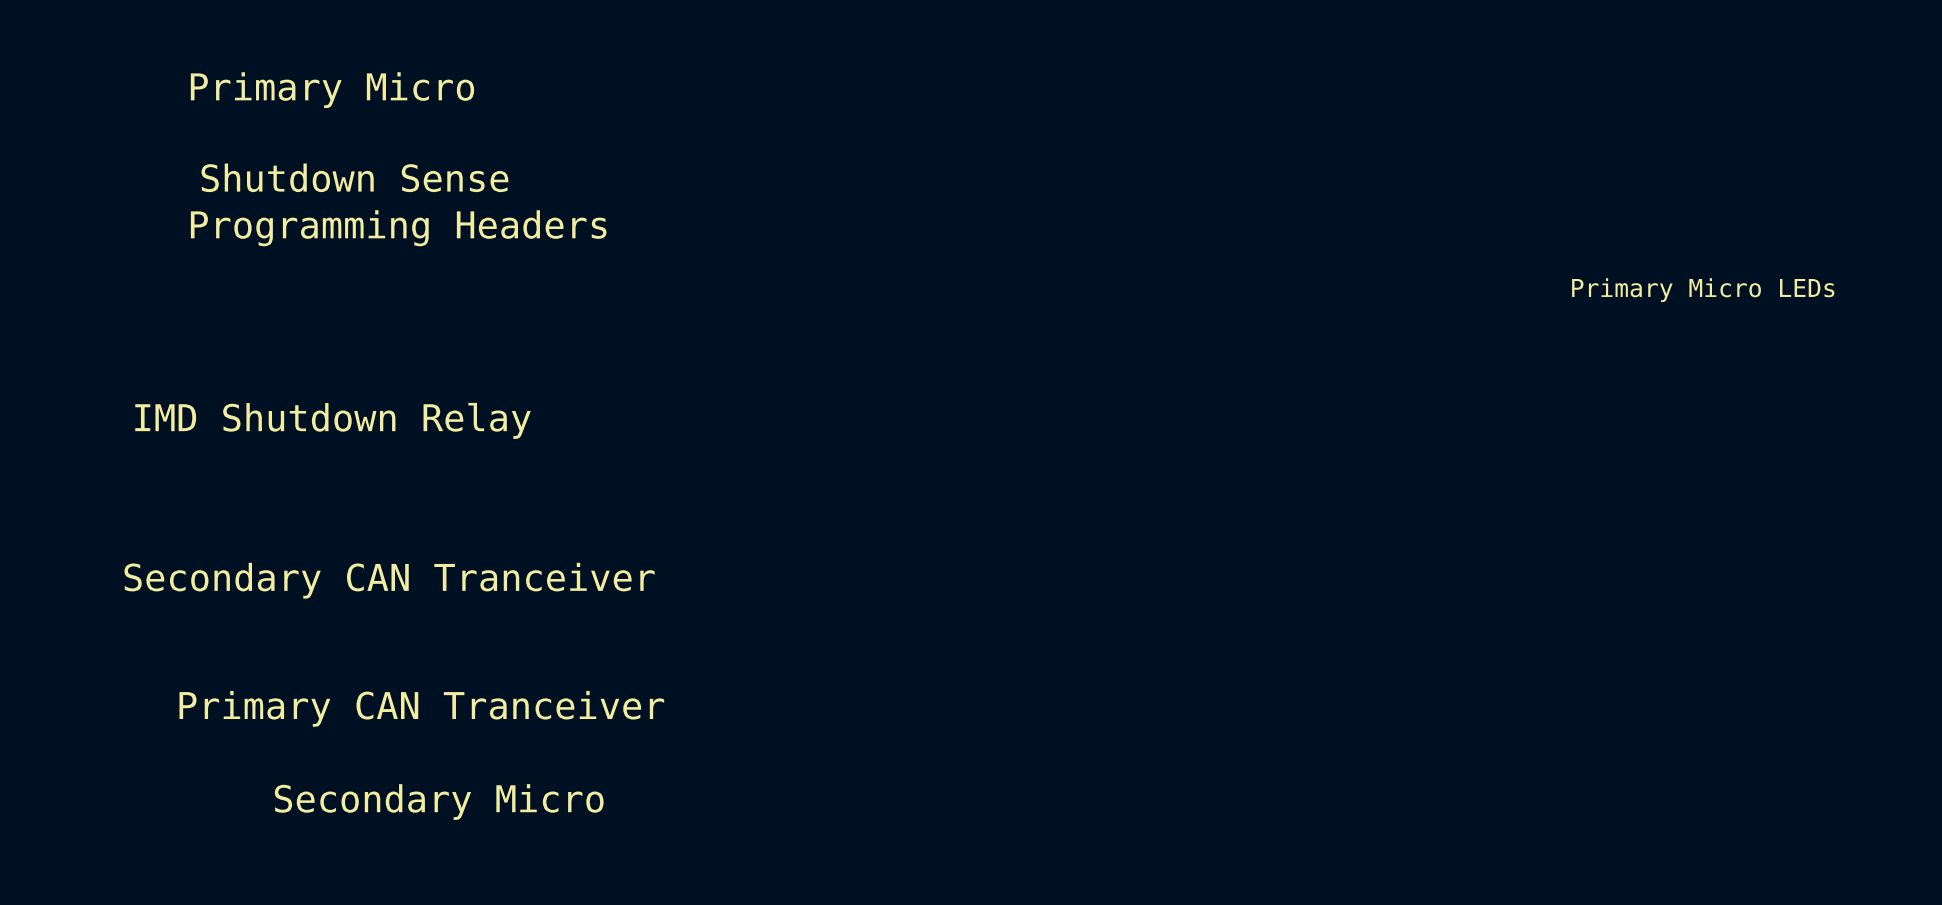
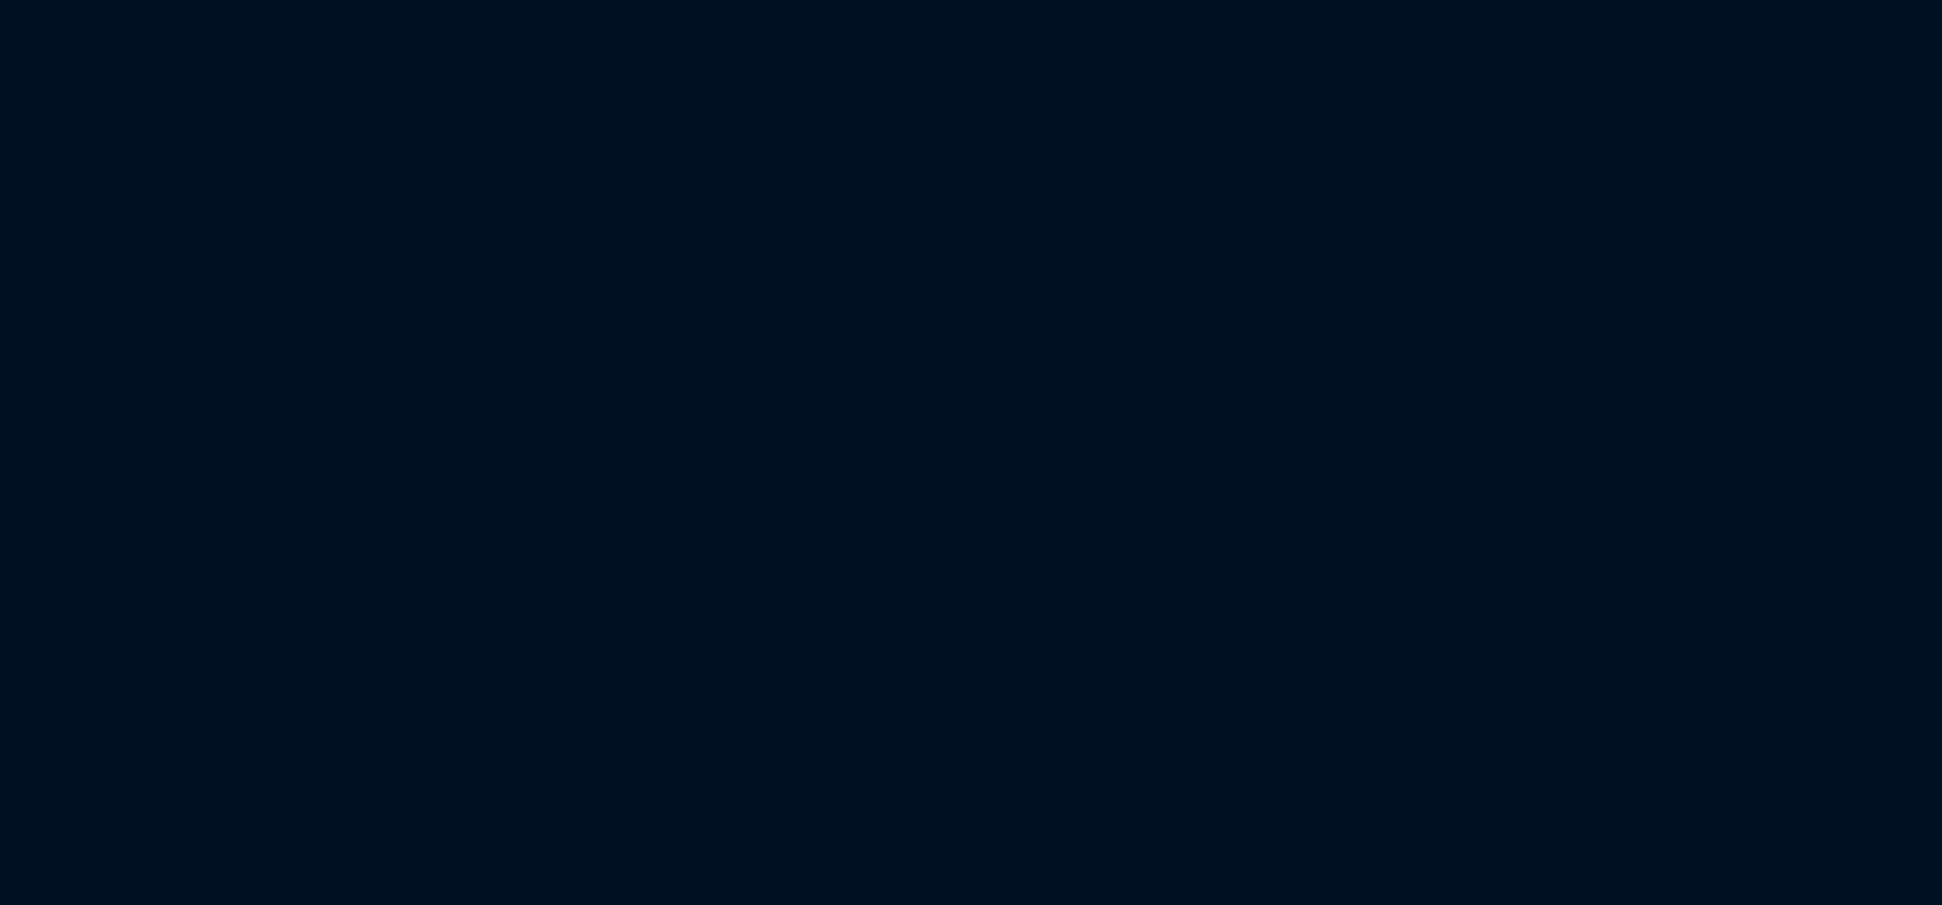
text: Primary Micro (332, 90) -> none
text: Shutdown Sense (354, 177) -> none
text: Programming Headers (398, 228) -> none
text: Primary Micro LEDs (1703, 290) -> none
text: IMD Shutdown Relay (333, 420) -> none
text: Secondary CAN Tranceiver (389, 580) -> none
text: Primary CAN Tranceiver (421, 708) -> none
text: Secondary Micro (439, 802) -> none

